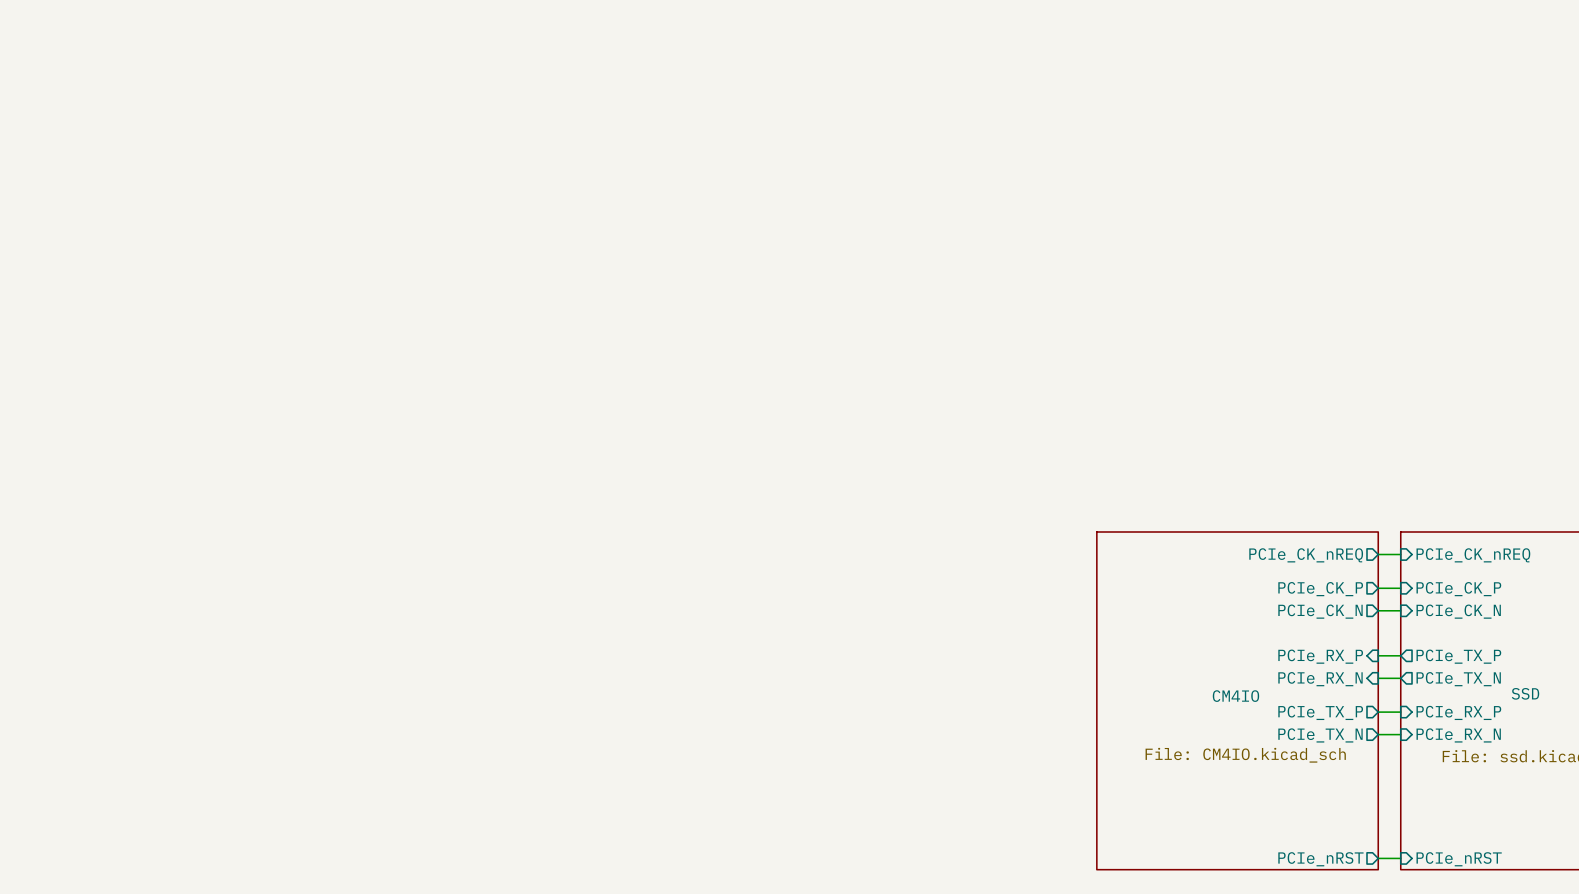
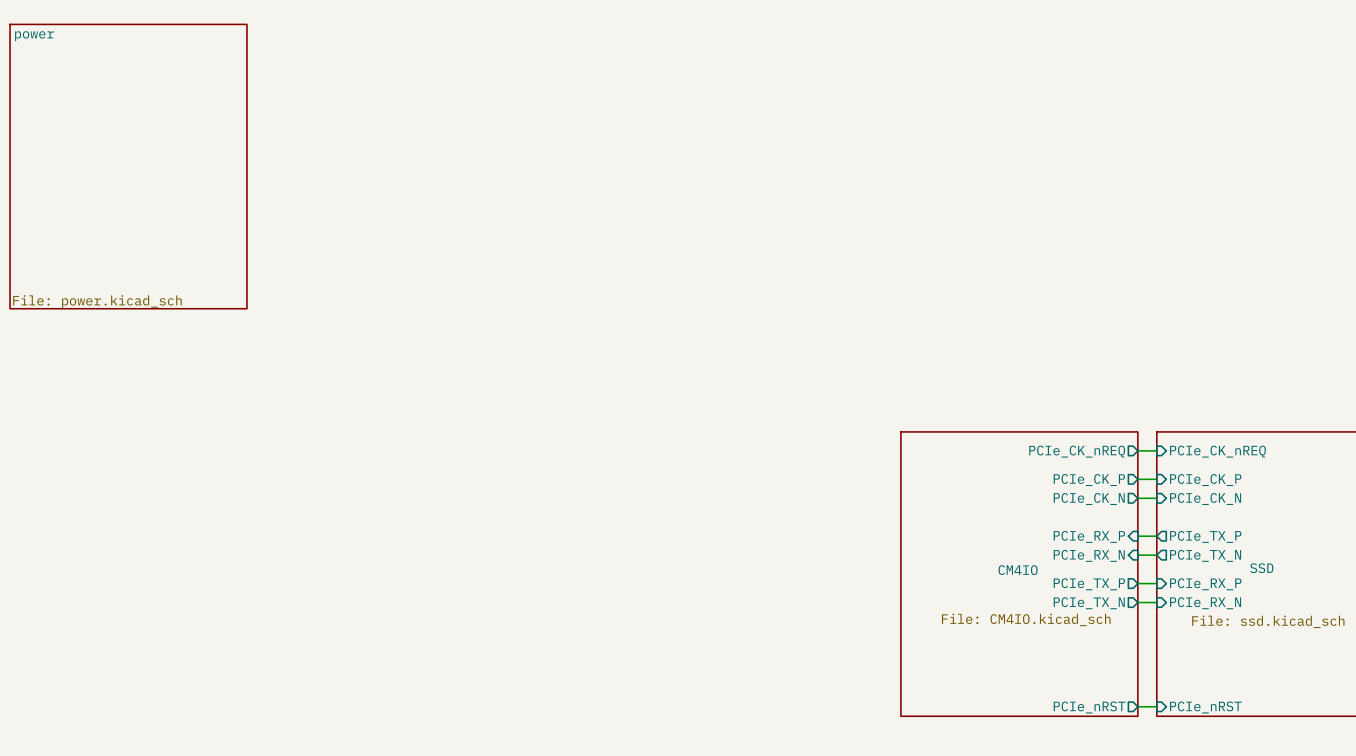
sheet power: none -> File: power.kicad_sch (128, 166)

